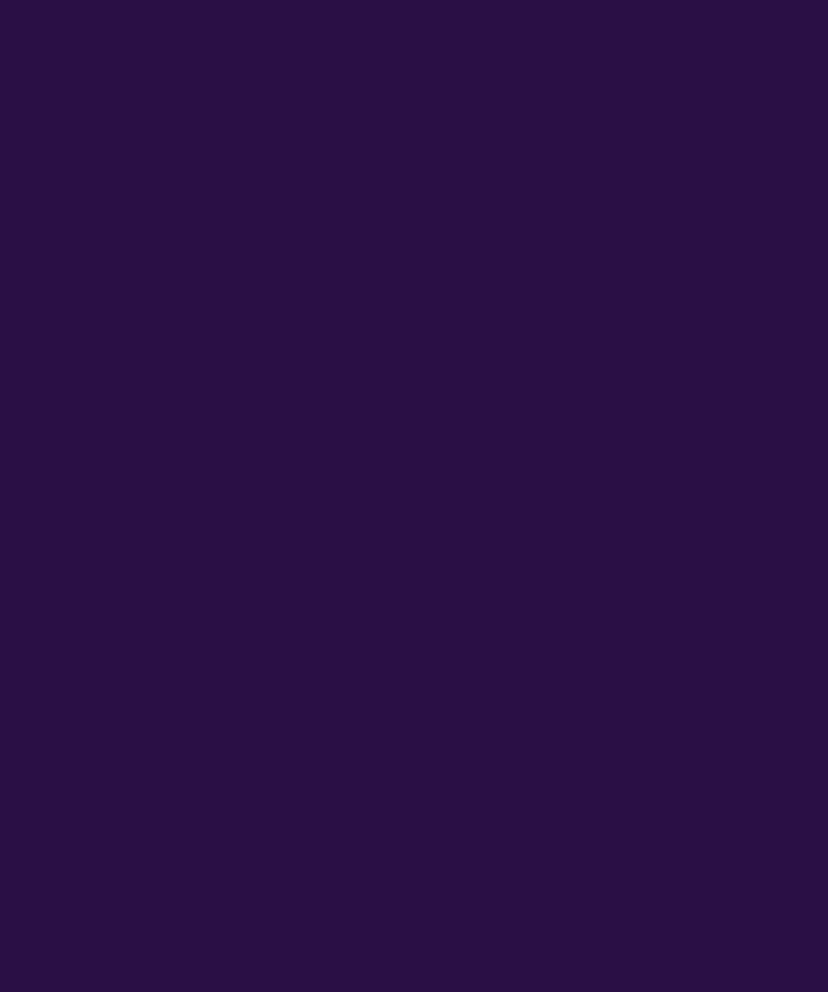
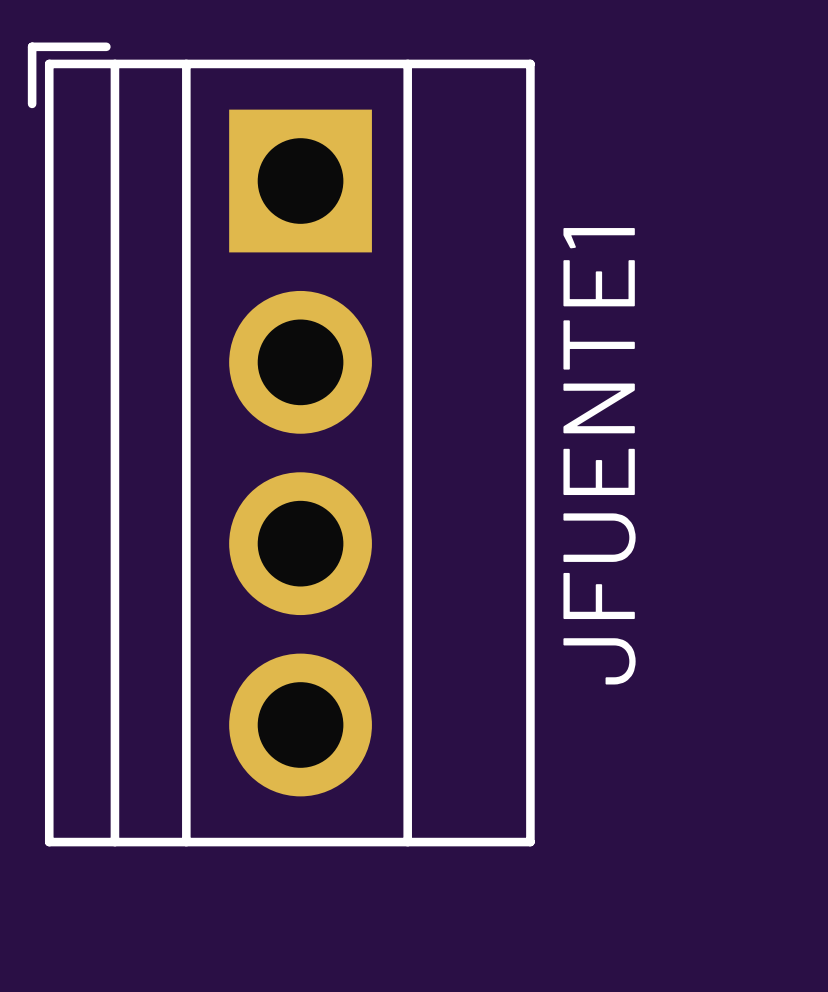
JFUENTE1: none -> (281, 444)

